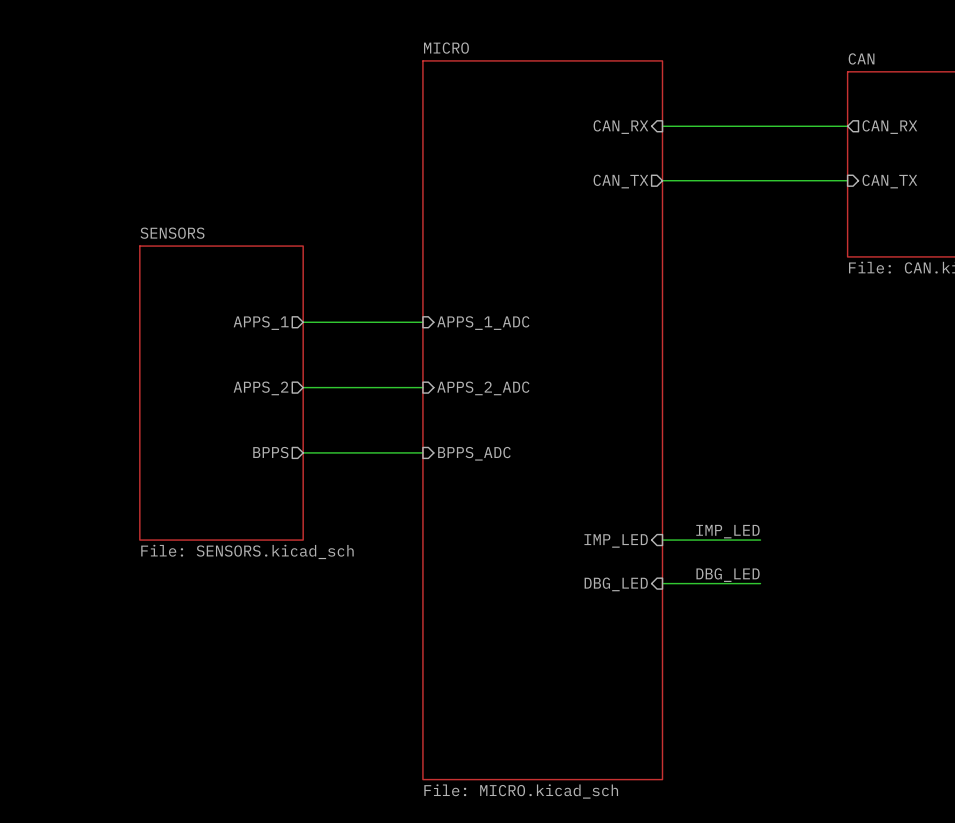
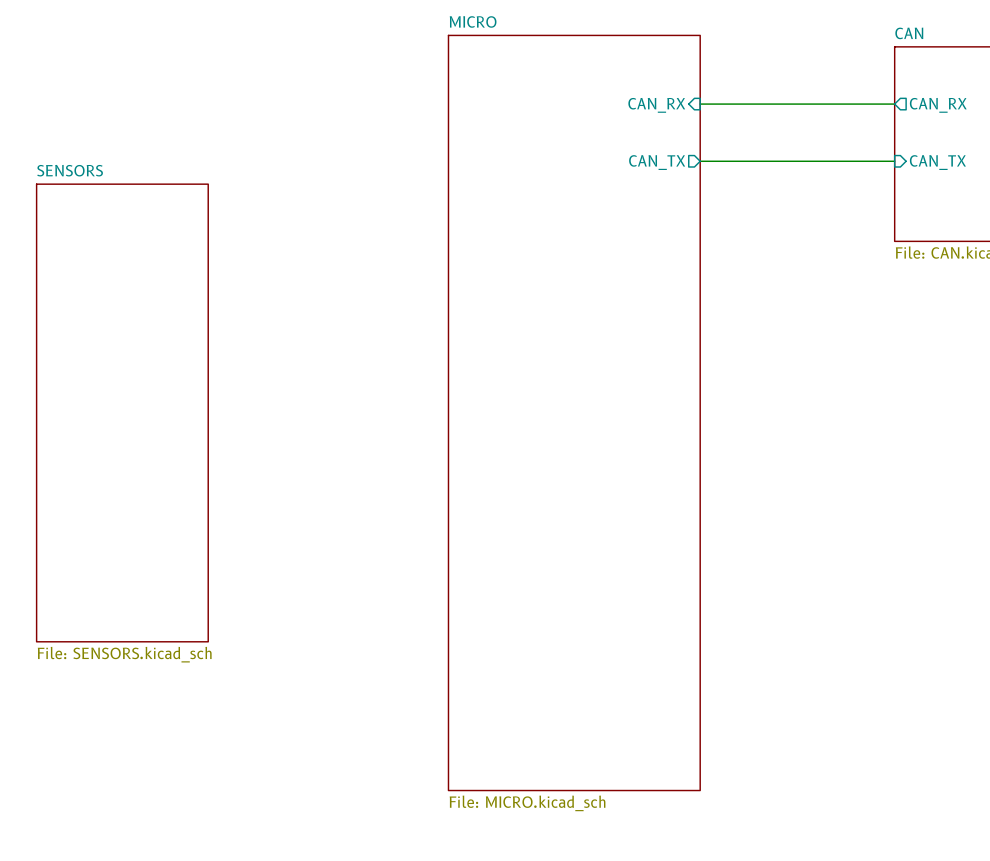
wire: (303, 322) (422, 322) -> none
sheet pin: APPS_1 (261, 323) -> none
sheet pin: APPS_1_ADC (483, 323) -> none
wire: (303, 387) (422, 387) -> none
sheet pin: APPS_2 (261, 388) -> none
sheet pin: APPS_2_ADC (483, 388) -> none
sheet SENSORS: File: SENSORS.kicad_sch (221, 393) -> none
sheet SENSORS: none -> File: SENSORS.kicad_sch (122, 412)
sheet pin: BPPS (270, 452) -> none
wire: (303, 452) (422, 452) -> none
sheet pin: BPPS_ADC (474, 453) -> none
label: IMP_LED (727, 531) -> none
sheet pin: IMP_LED (616, 540) -> none
wire: (662, 540) (760, 540) -> none
label: DBG_LED (728, 575) -> none
wire: (662, 583) (760, 583) -> none
sheet pin: DBG_LED (616, 584) -> none

